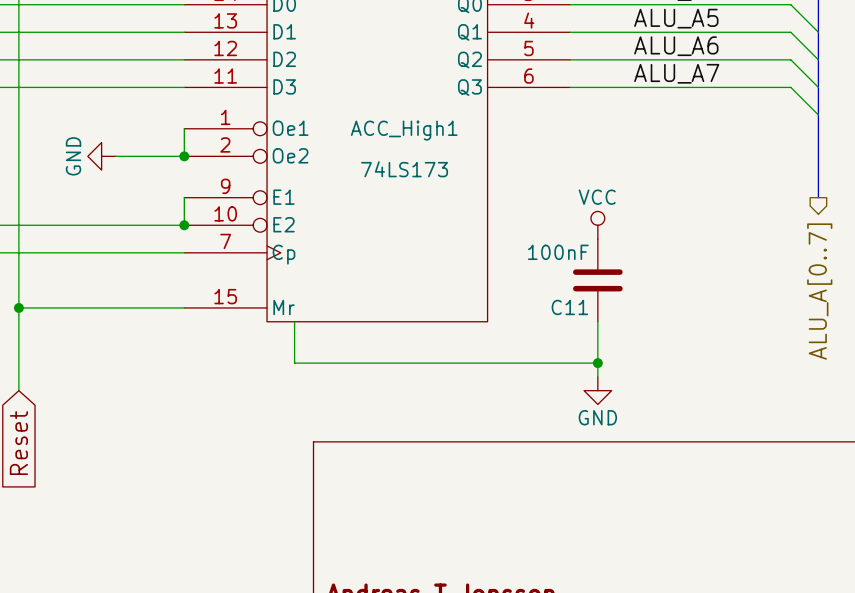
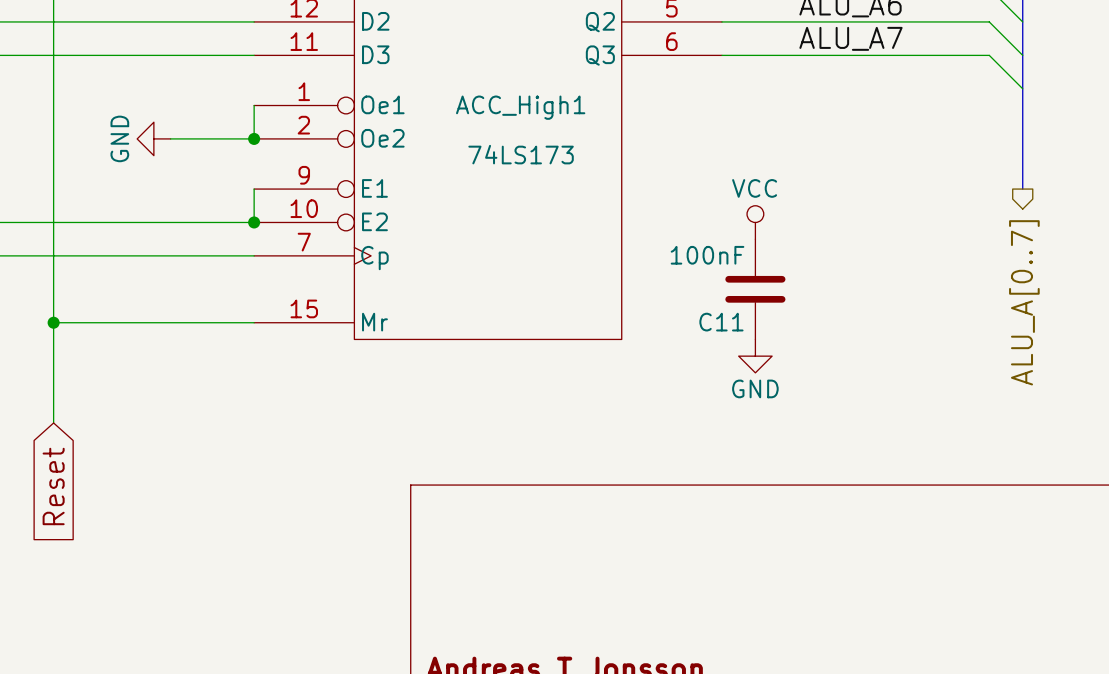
wire: (294, 321) (294, 363) (597, 363) -> none
wire: (597, 321) (597, 376) -> none
junction: (597, 363) -> none
power symbol position: GND (597, 390) -> GND (755, 356)

